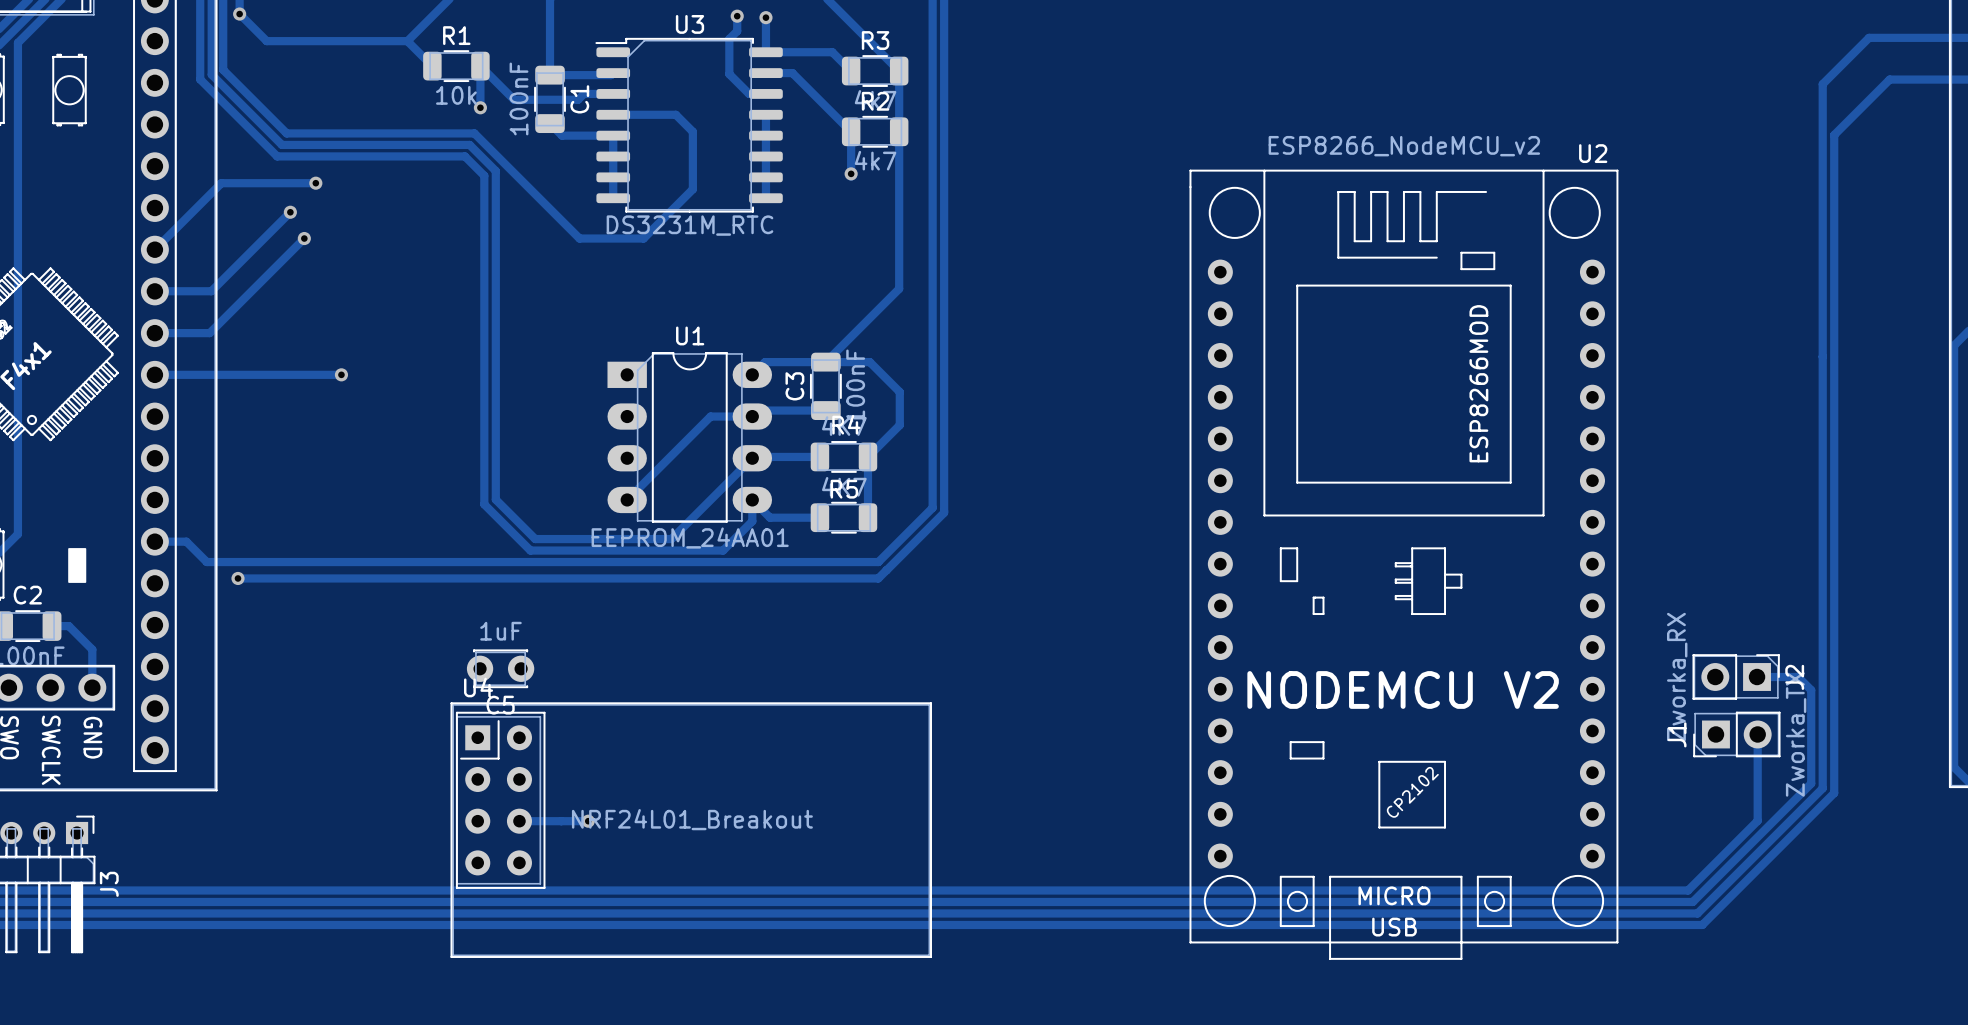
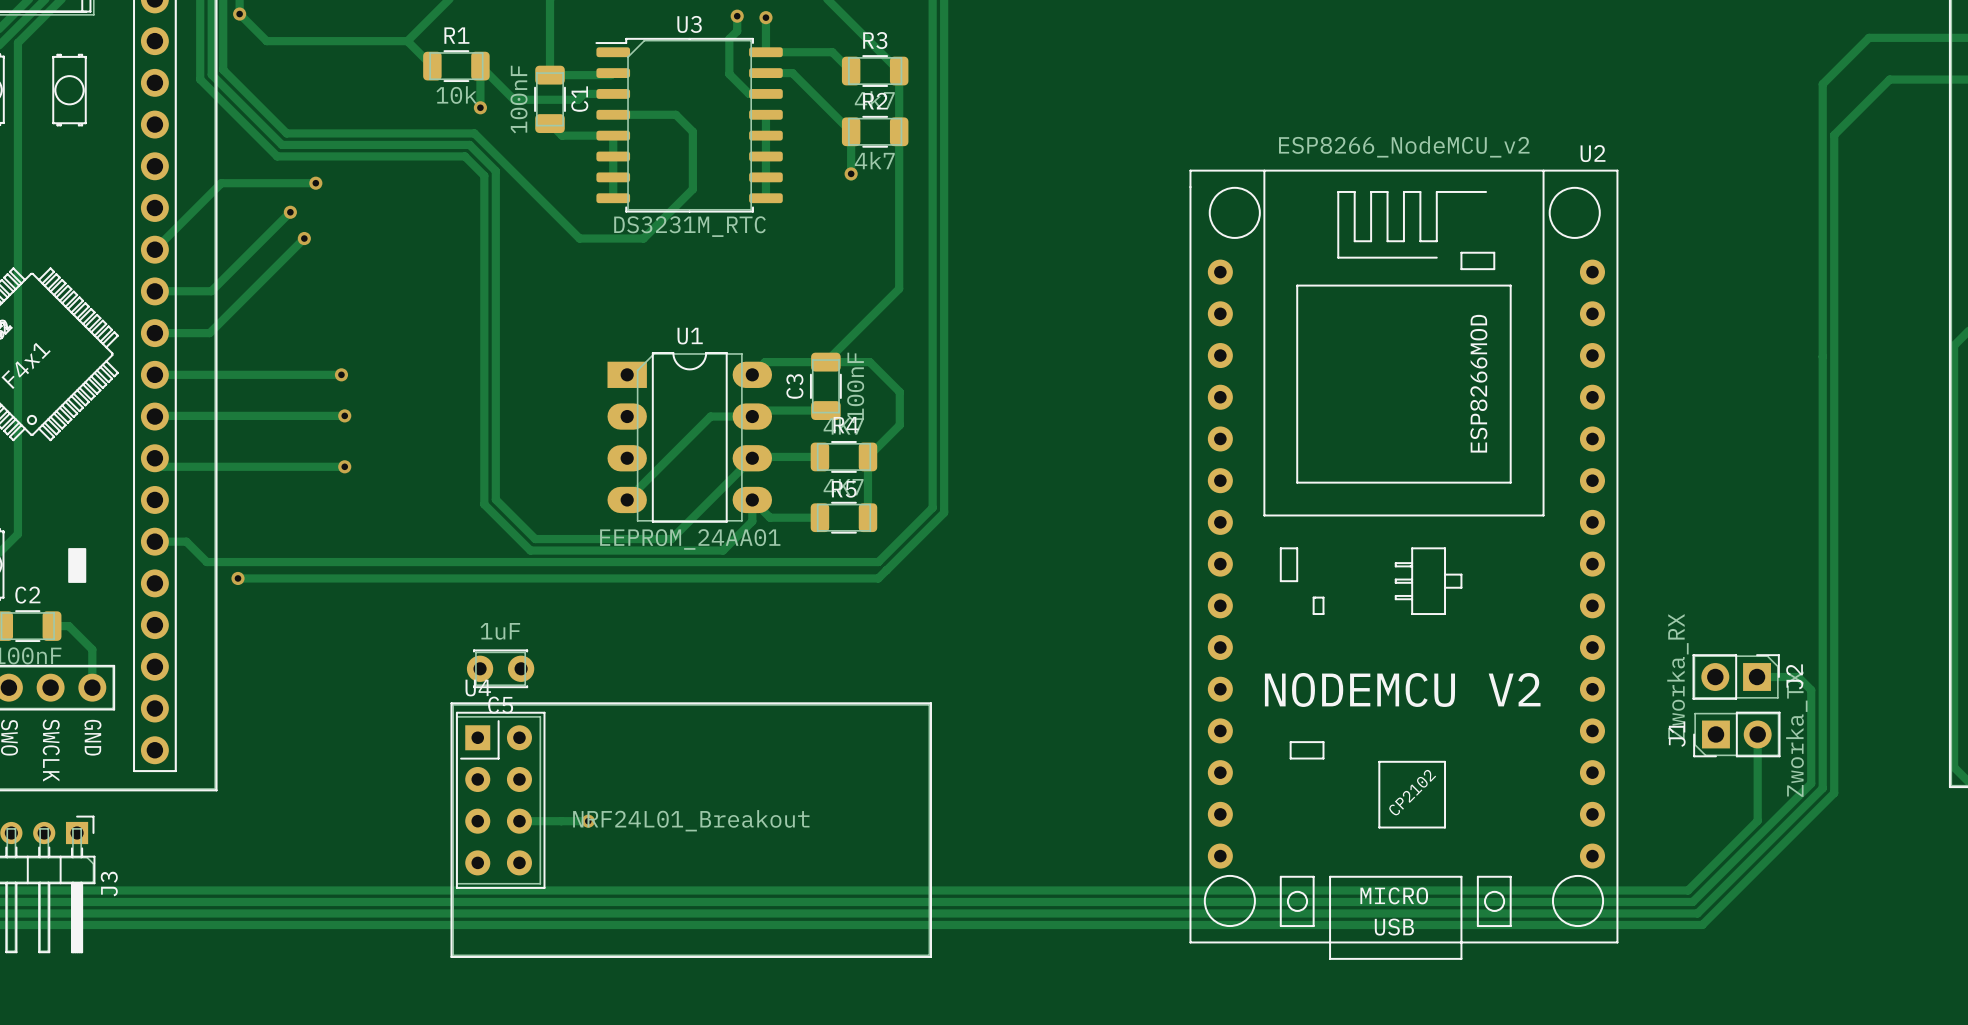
track: none -> (344, 415) (154, 416)
via: none -> (344, 415)
track: none -> (154, 458) (163, 466) (344, 466)
via: none -> (344, 466)

